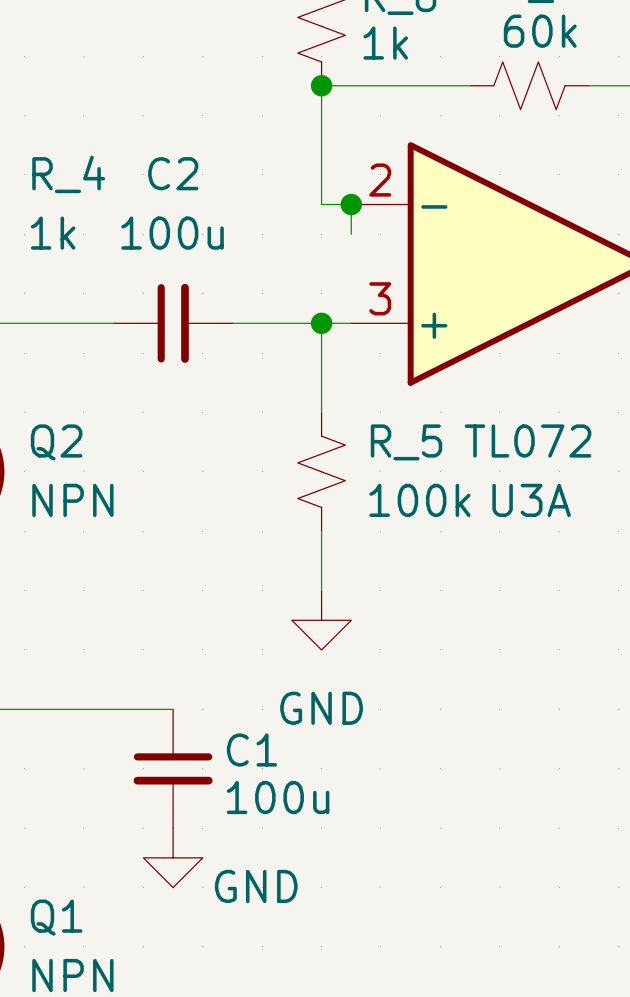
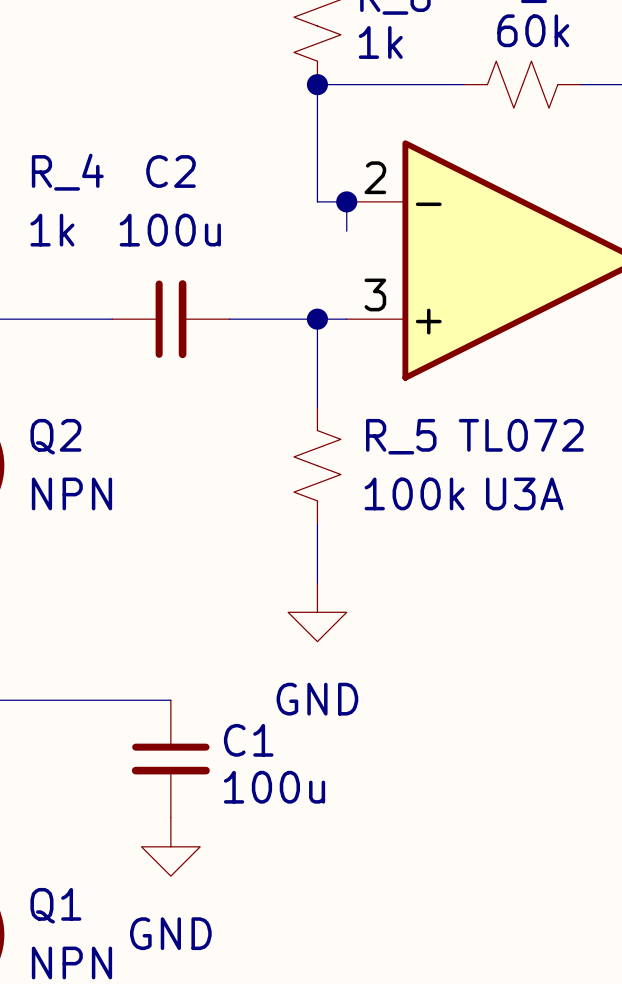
power symbol text position: GND (256, 886) -> GND (170, 933)

